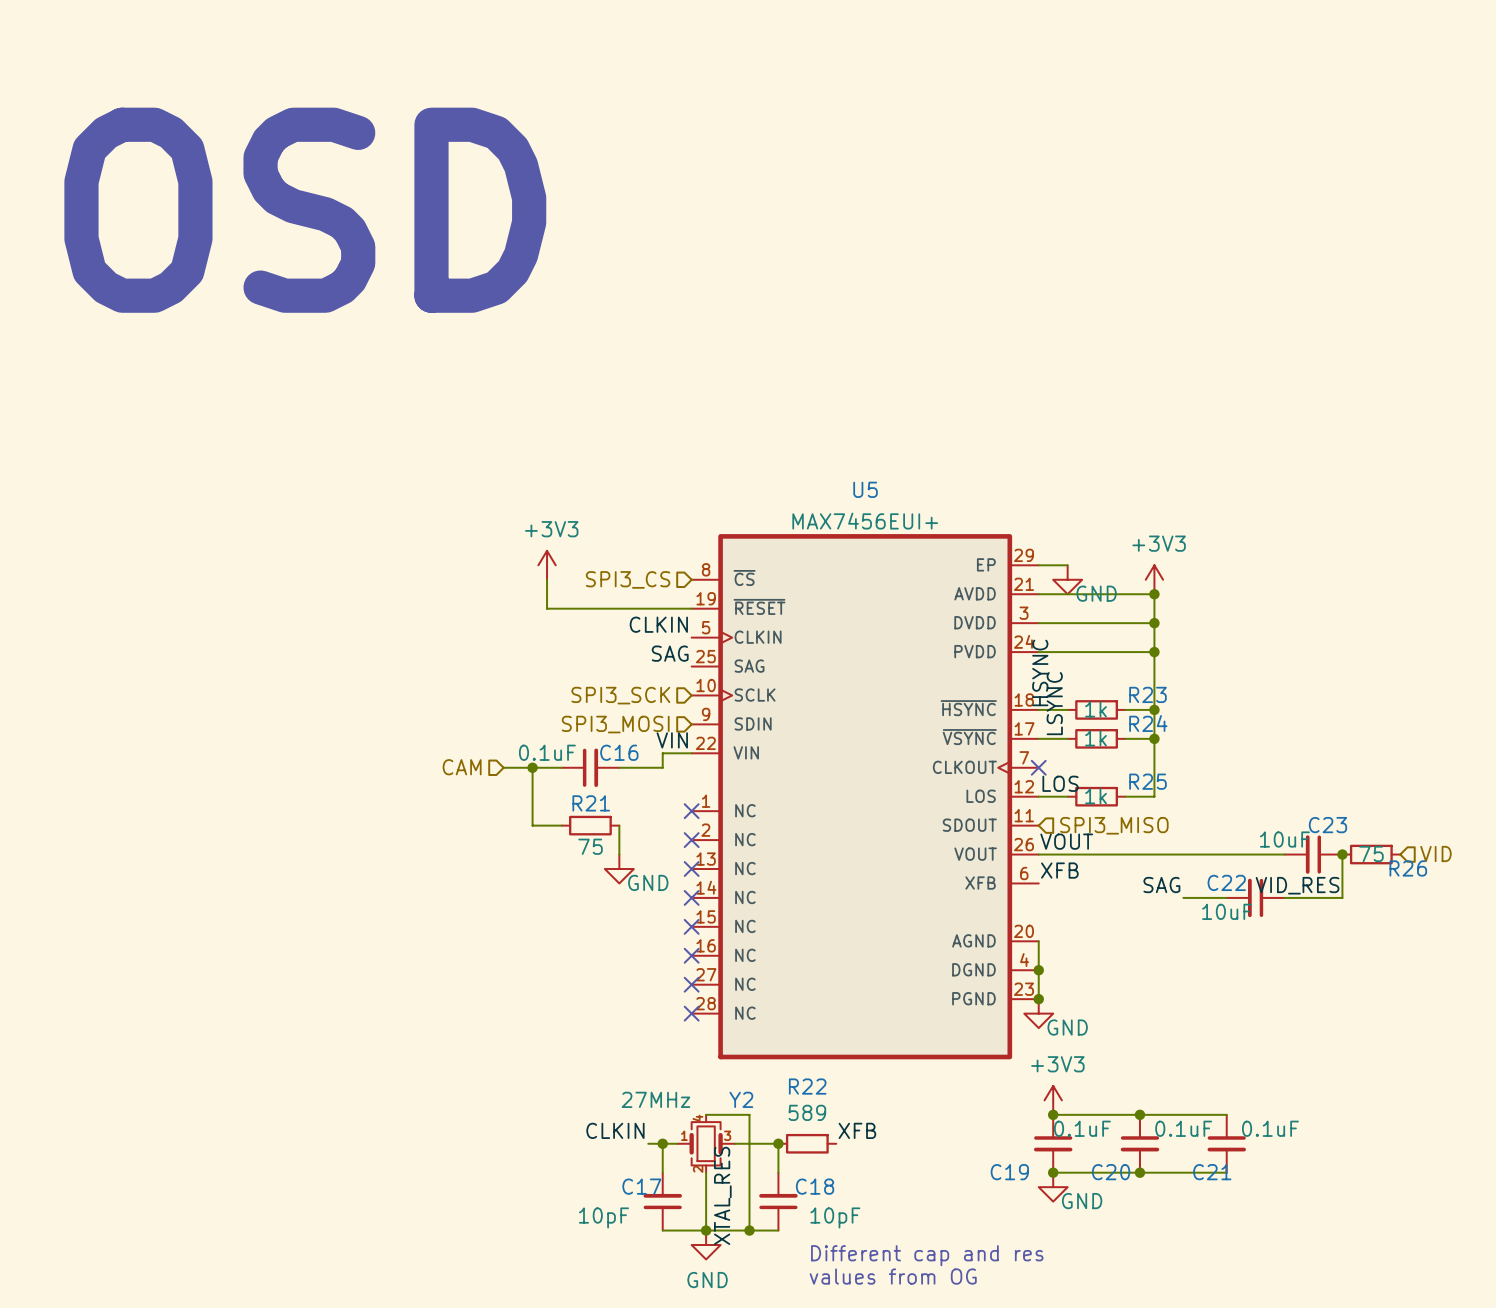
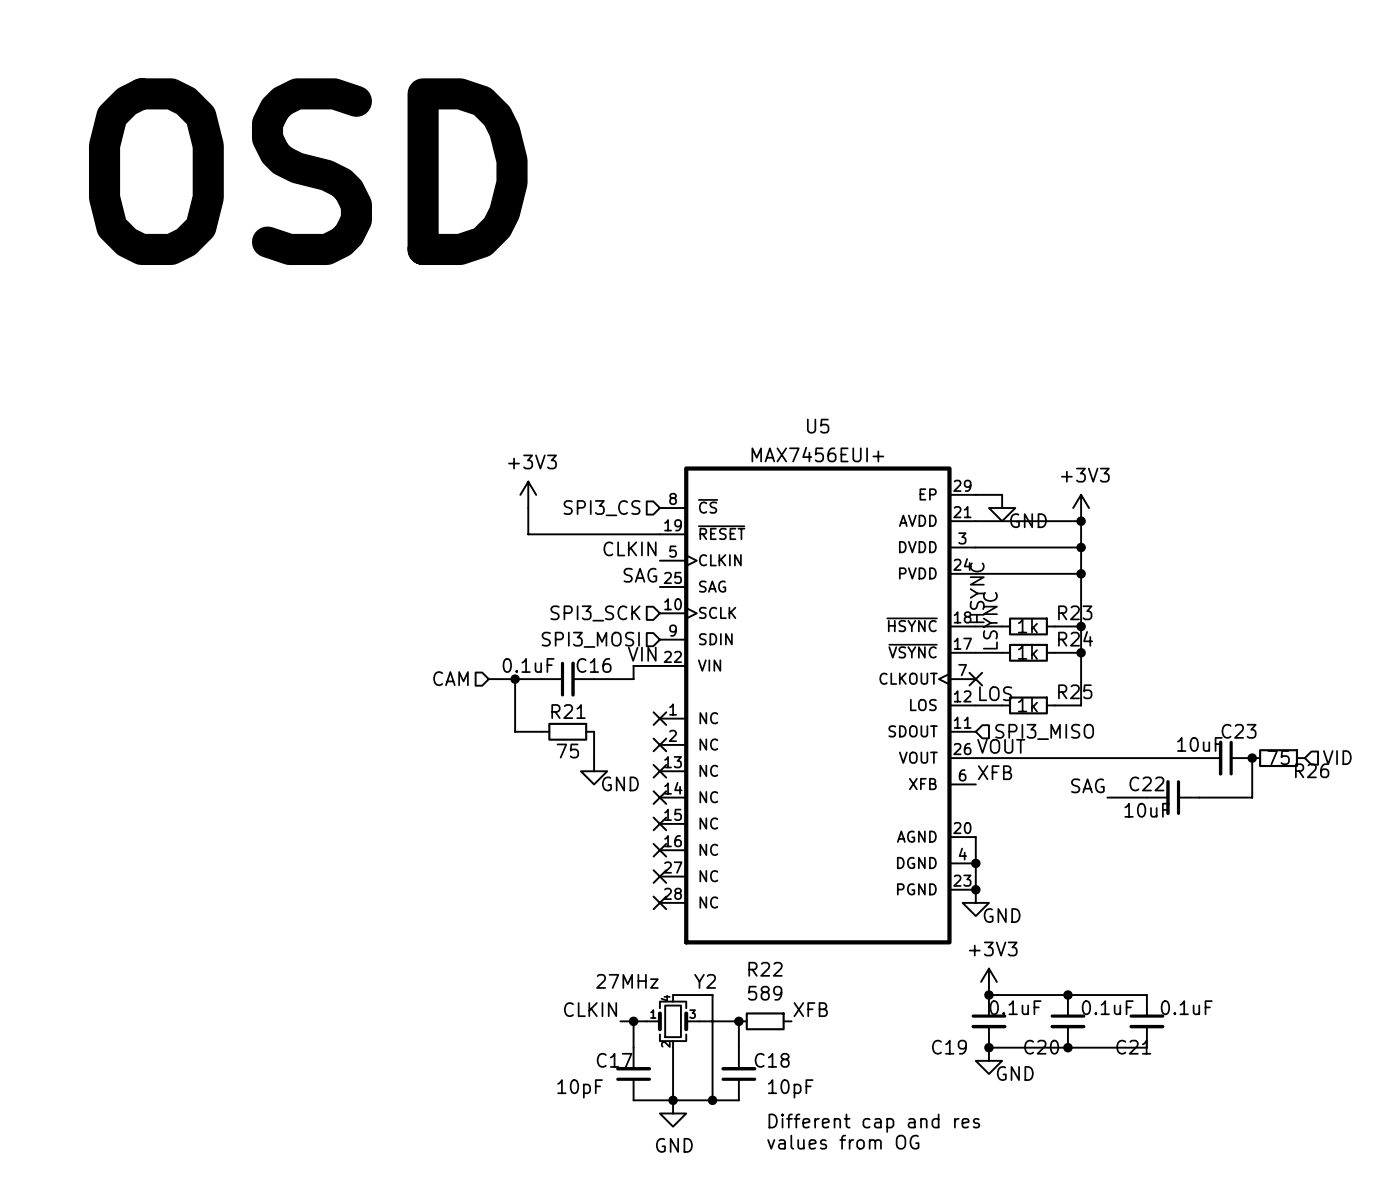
label: VID_RES (1297, 885) -> none
label: XTAL_RES (722, 1195) -> none

